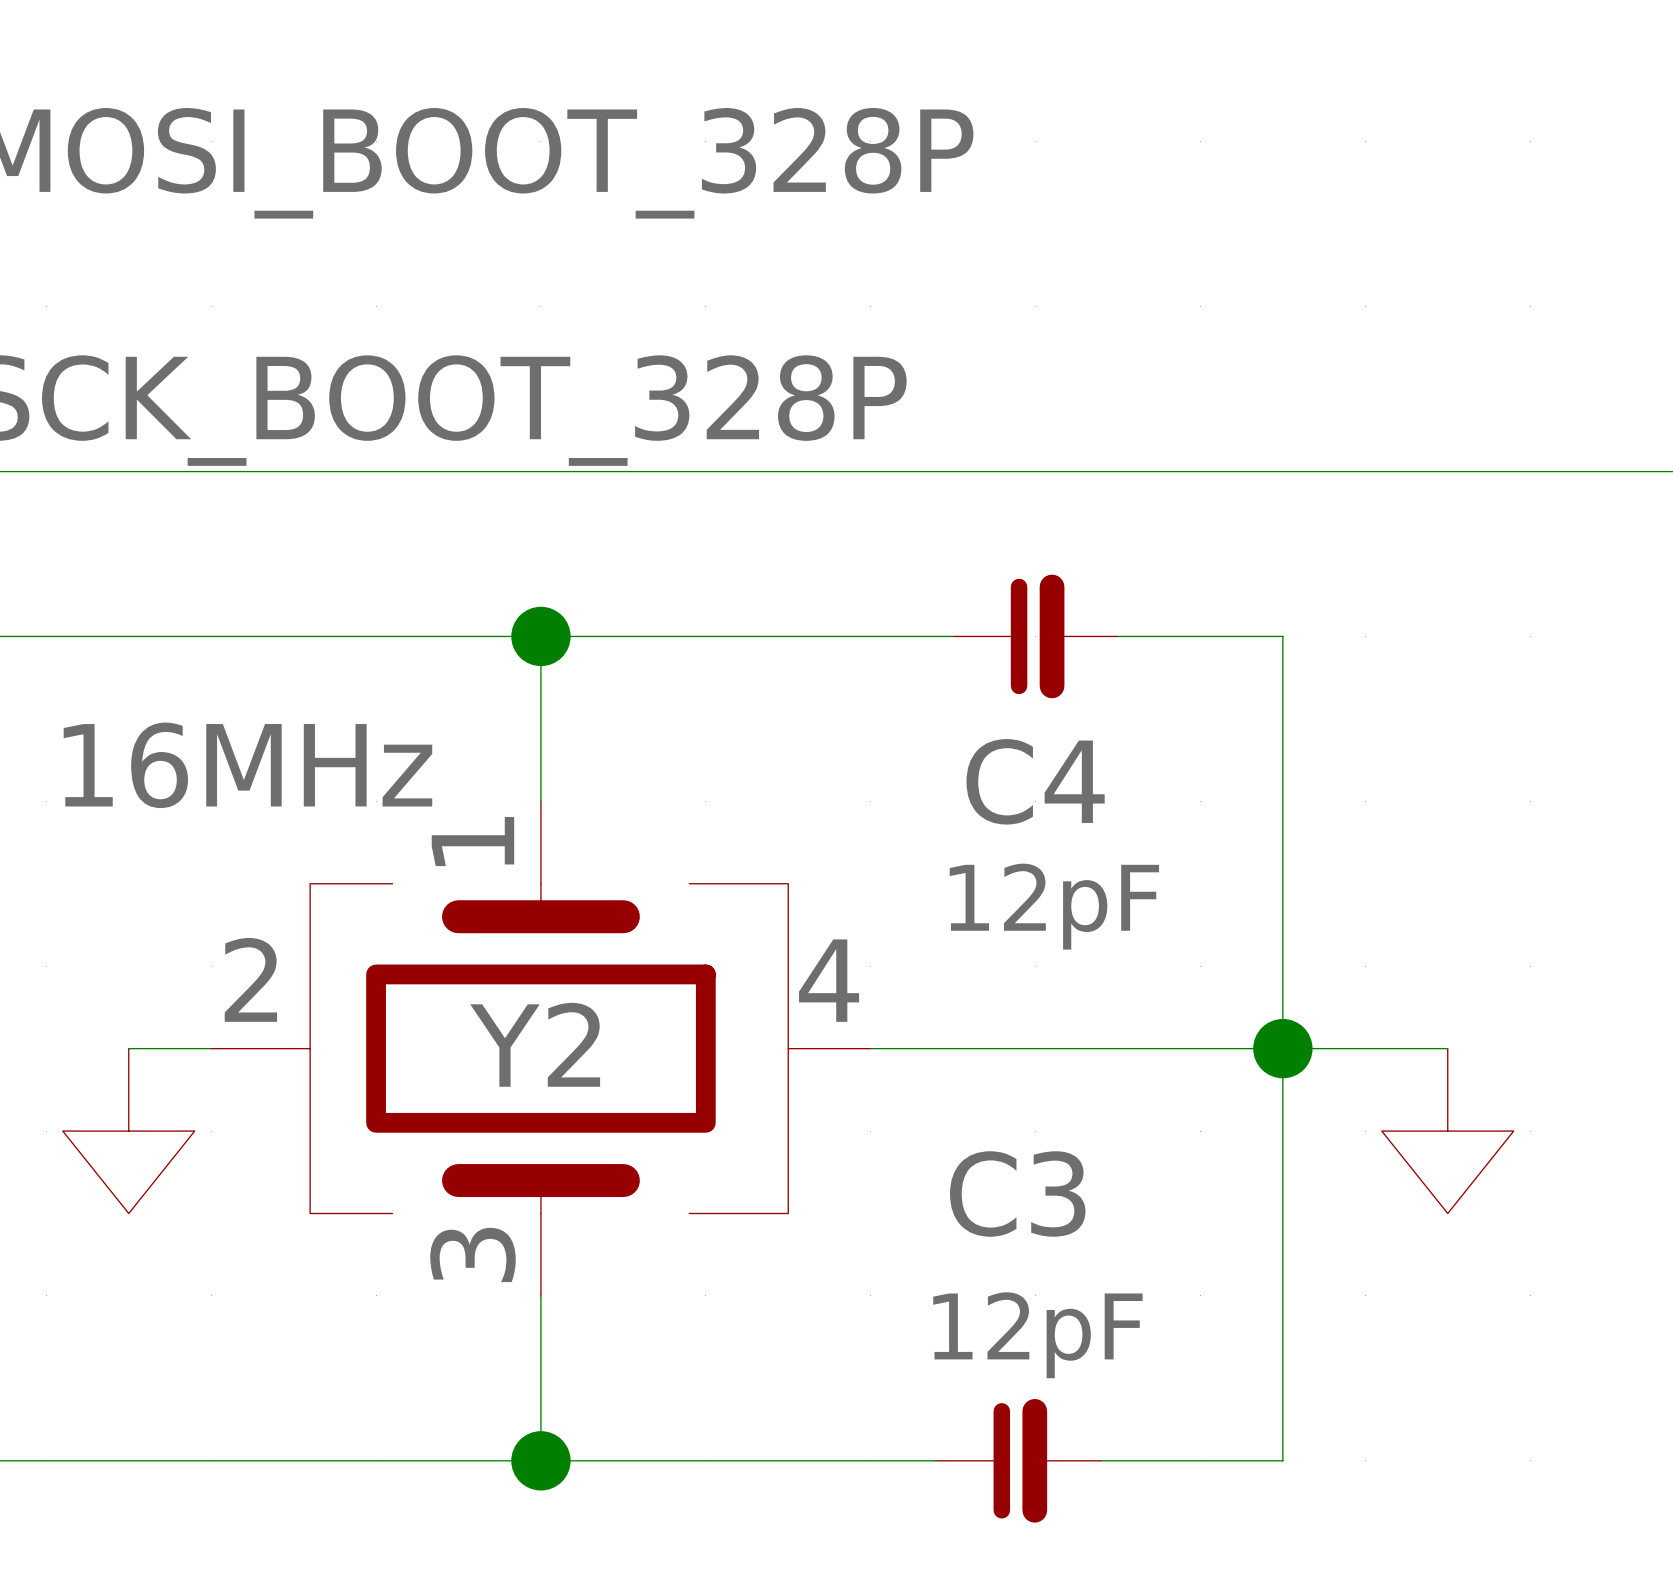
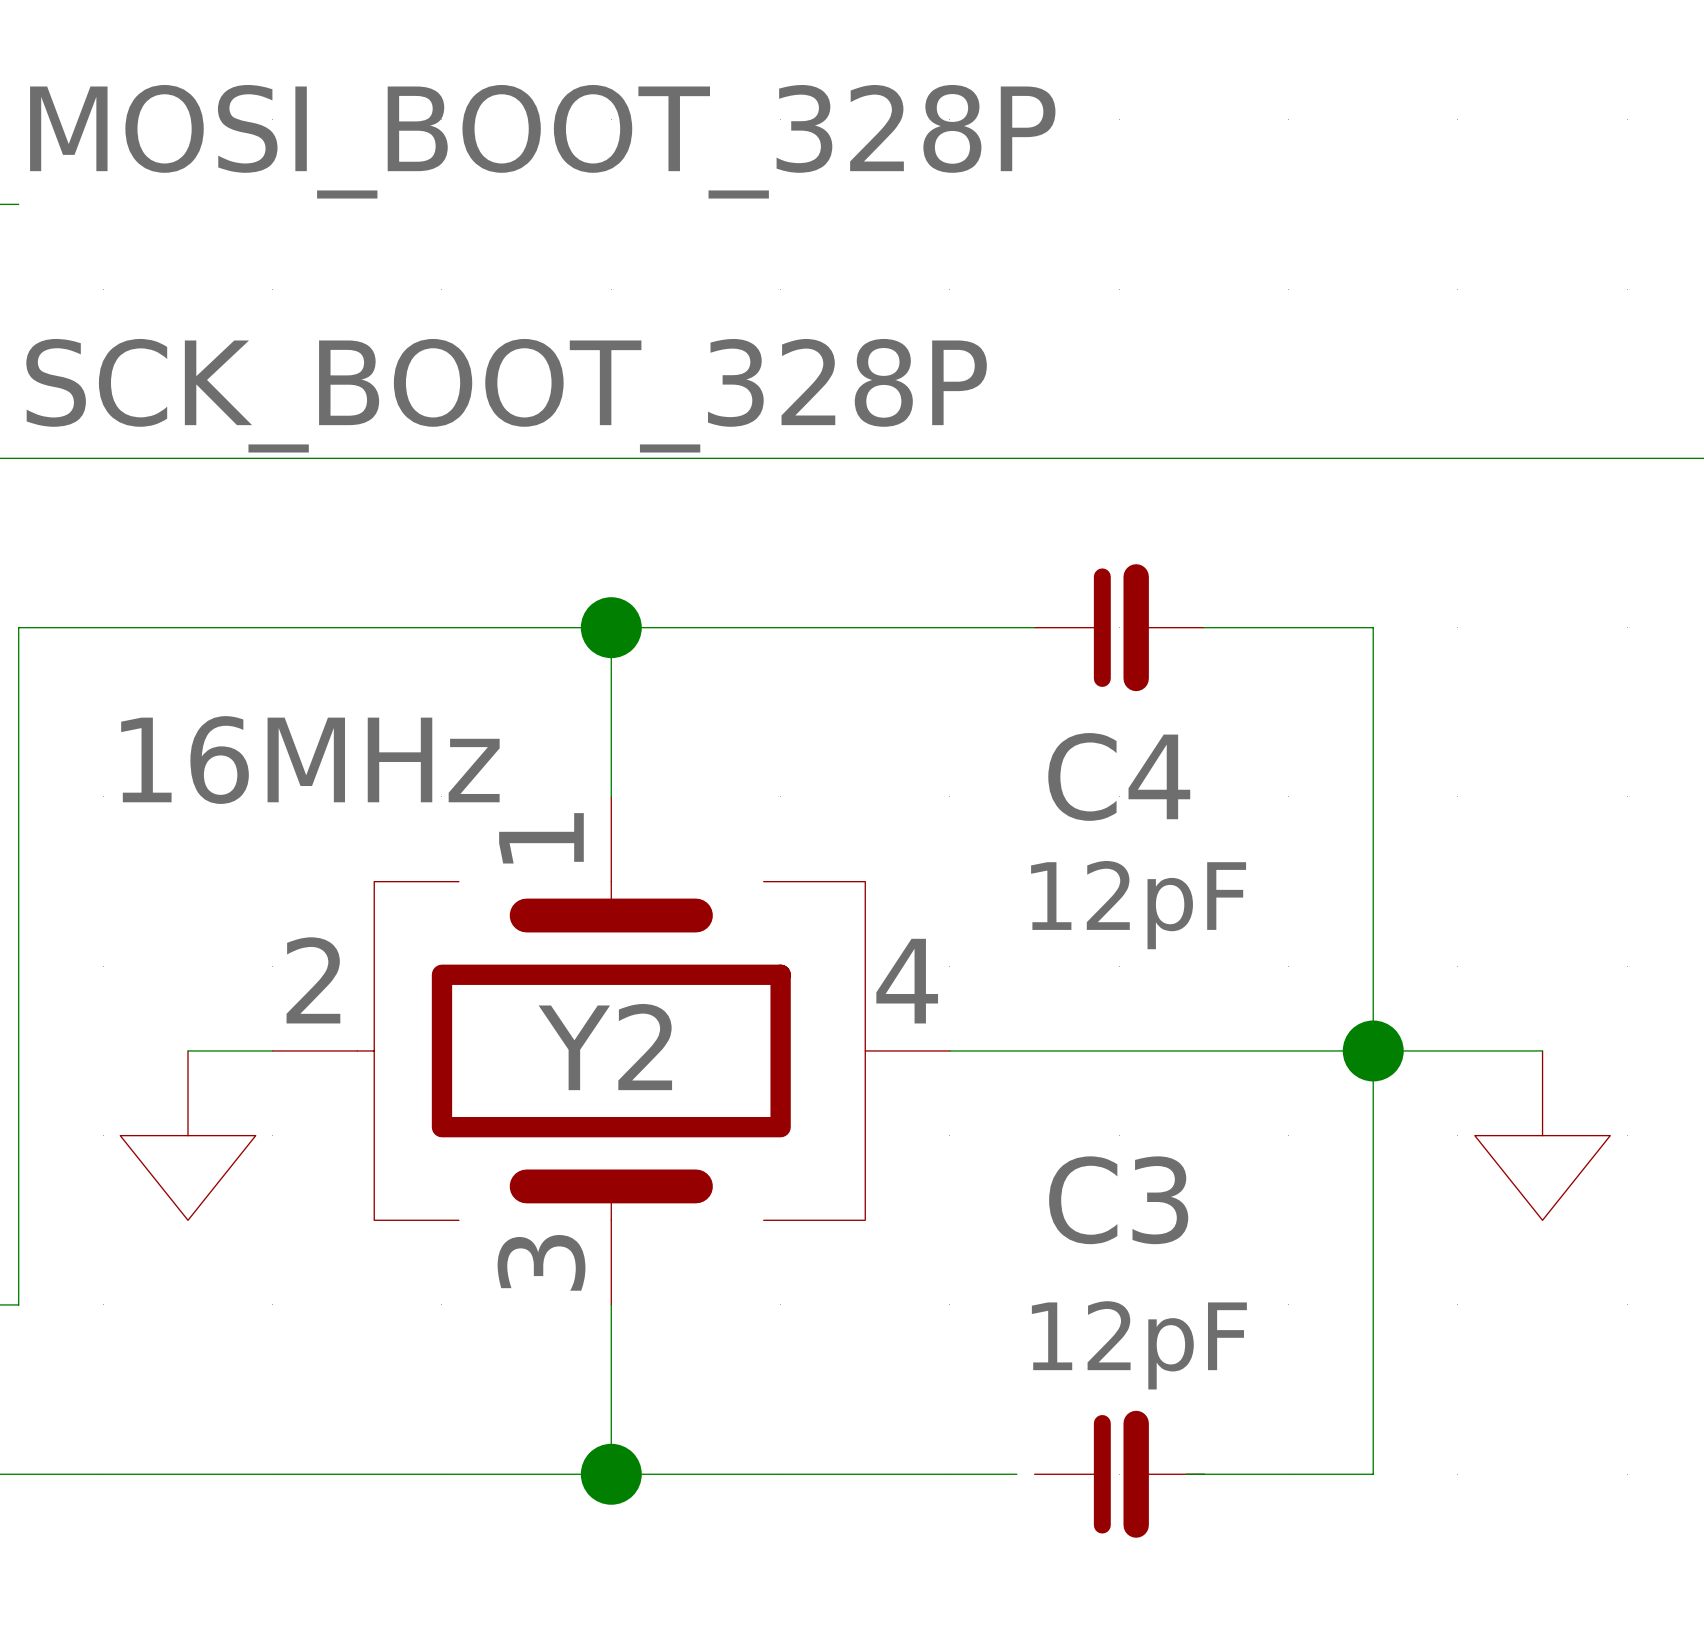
C3 position: (1018, 1460) -> (1119, 1474)

